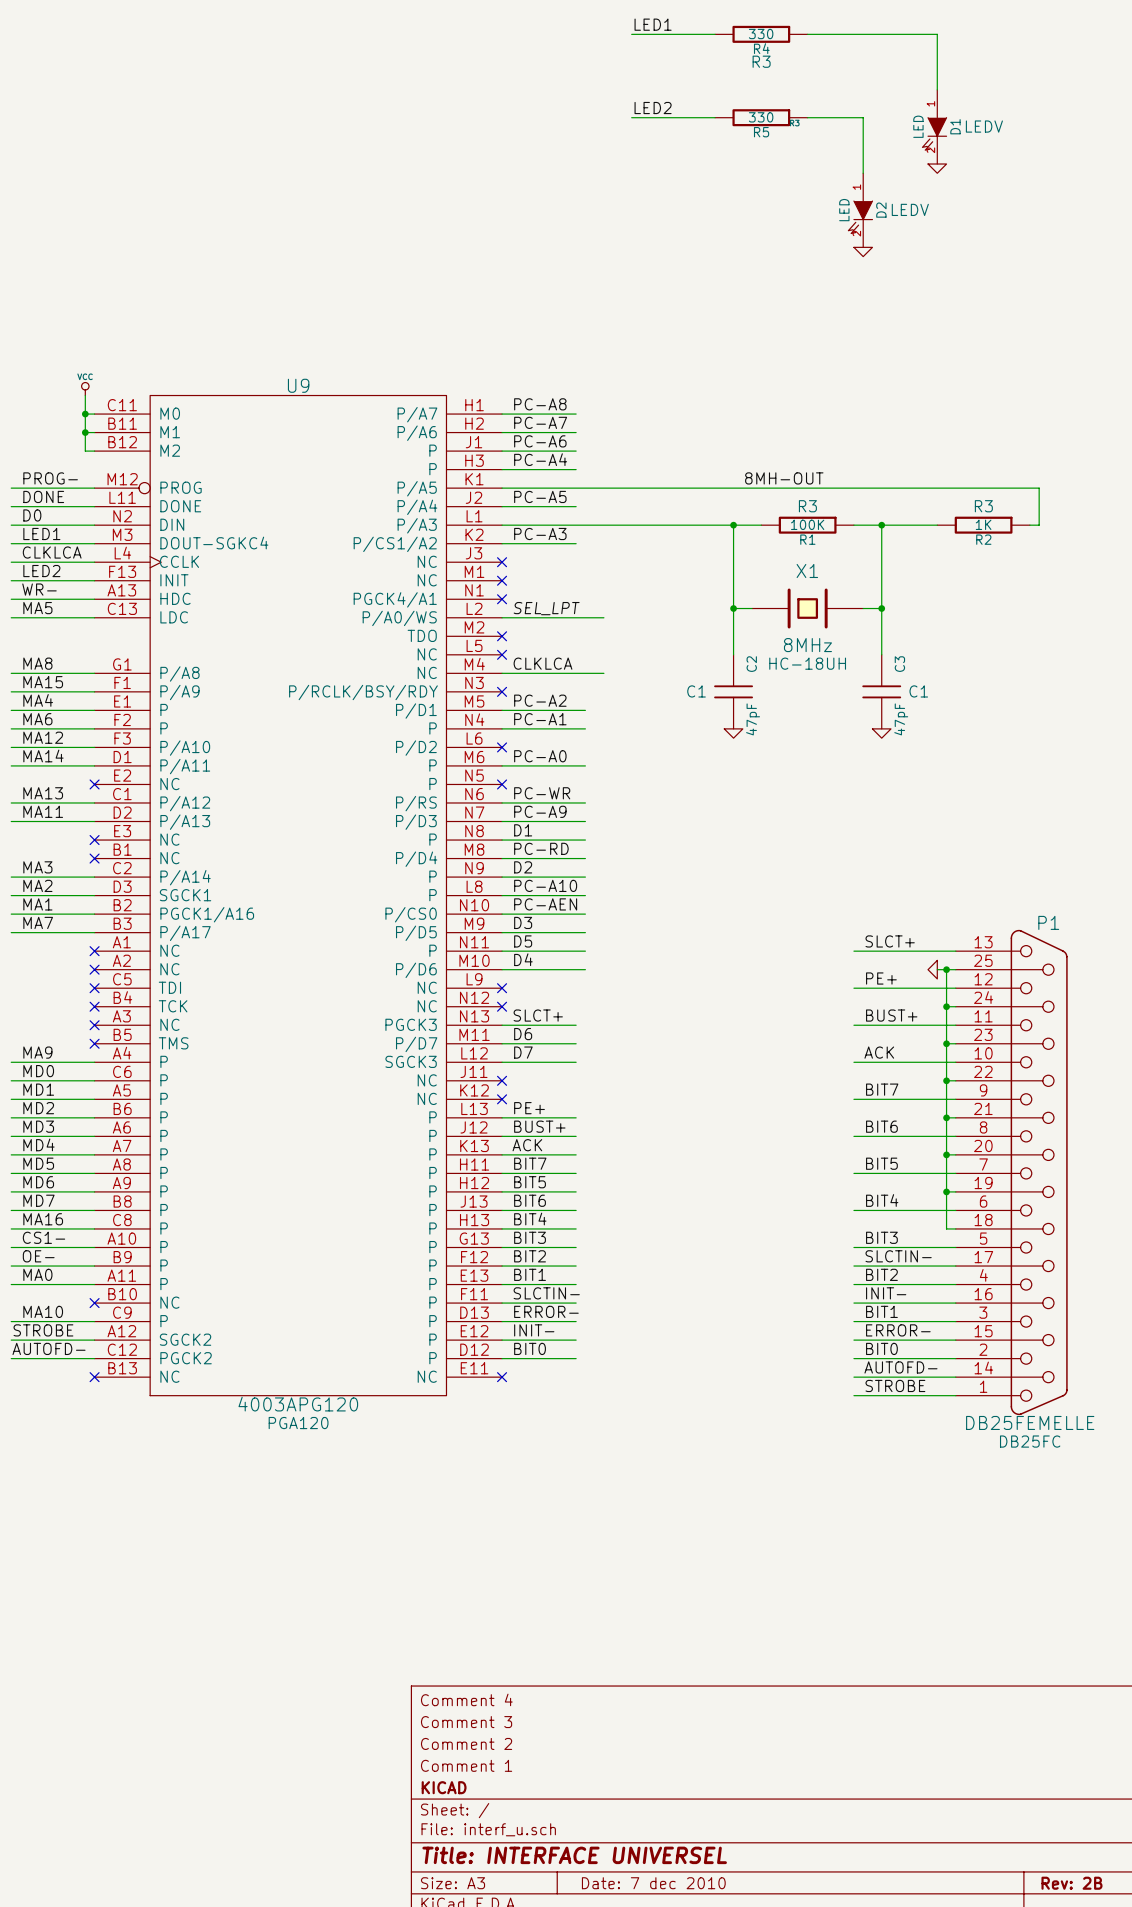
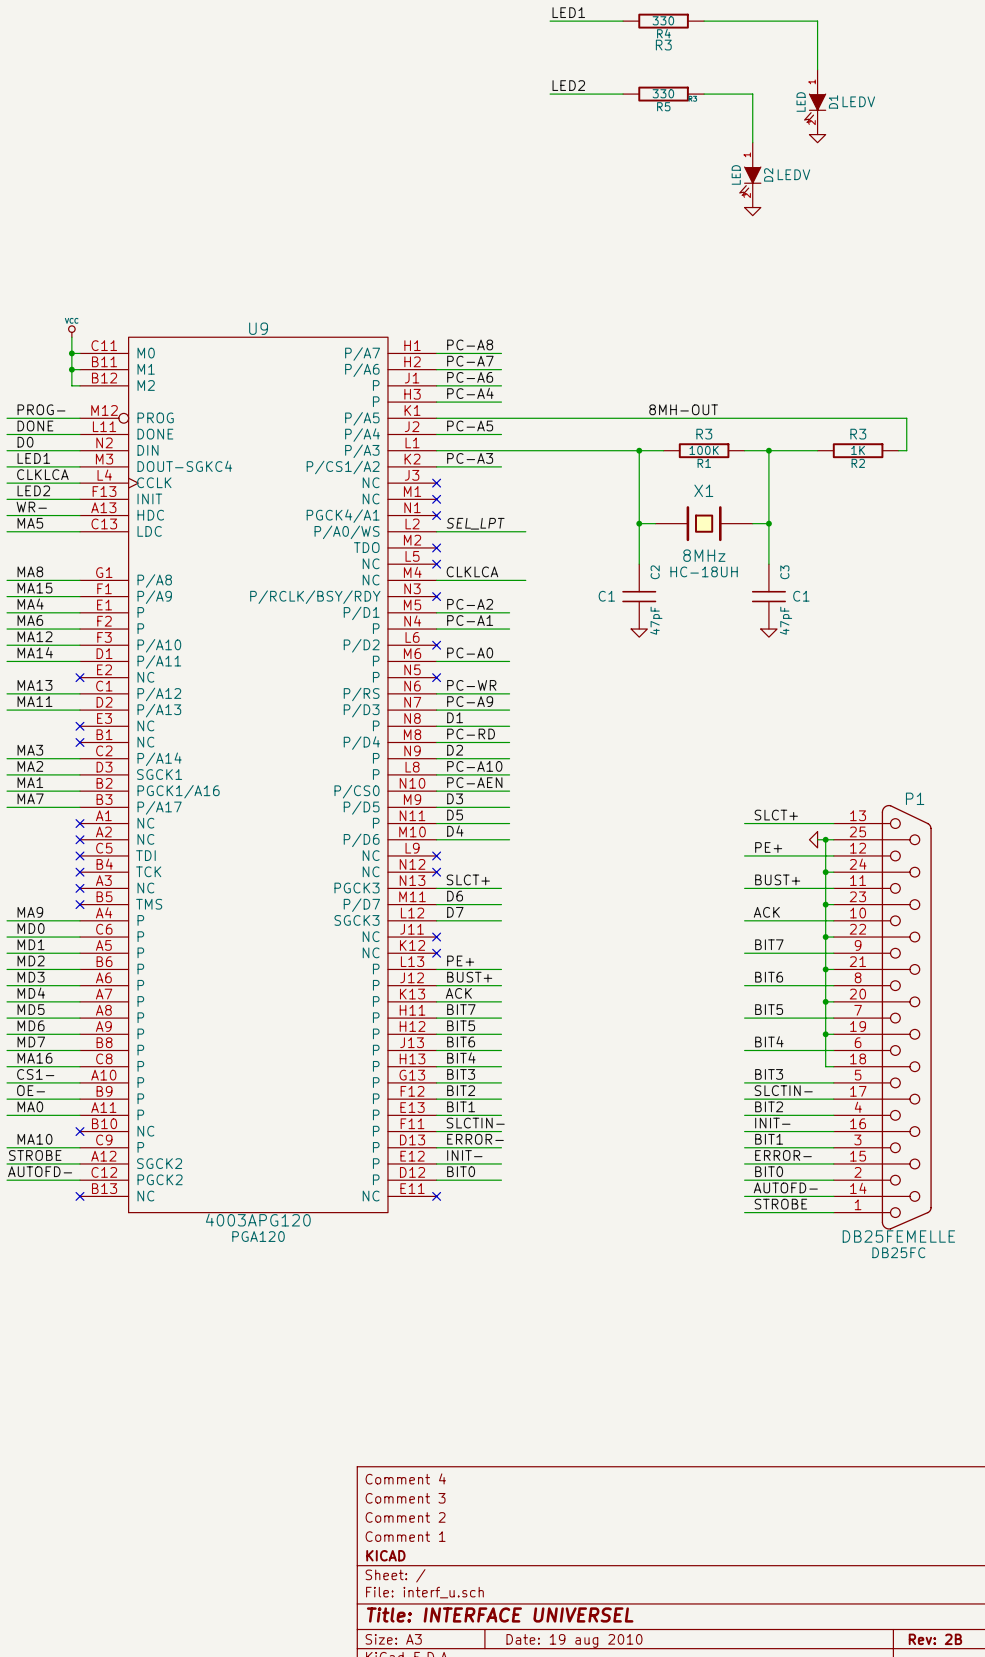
title block: Date: 7 dec 2010 (653, 1883) -> Date: 19 aug 2010 (574, 1640)

